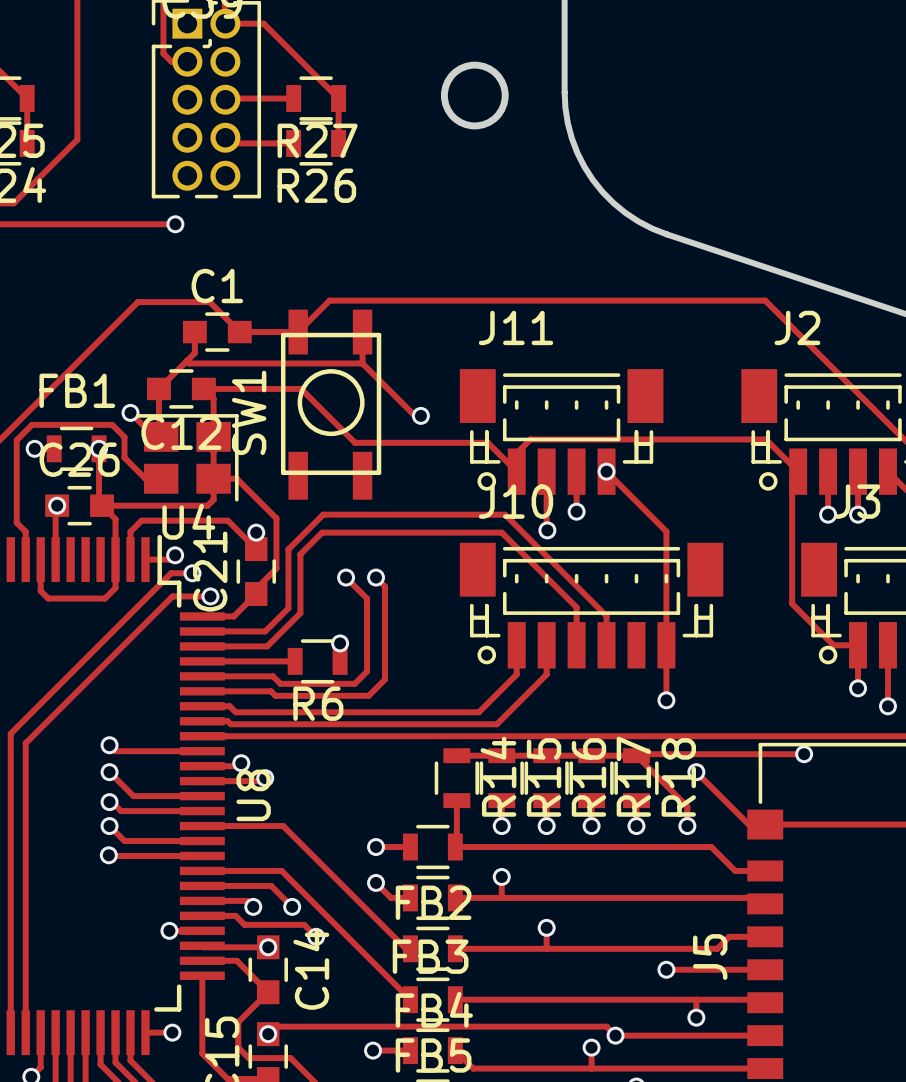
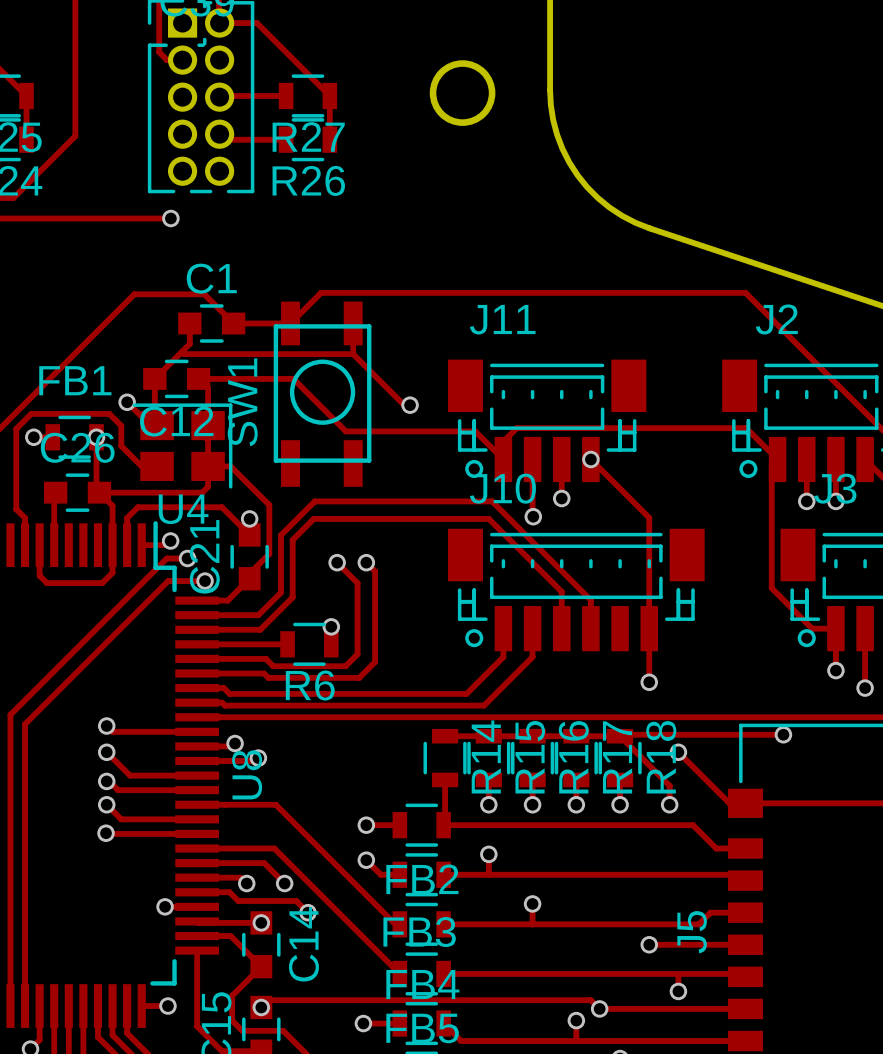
via: (57, 505) -> none

